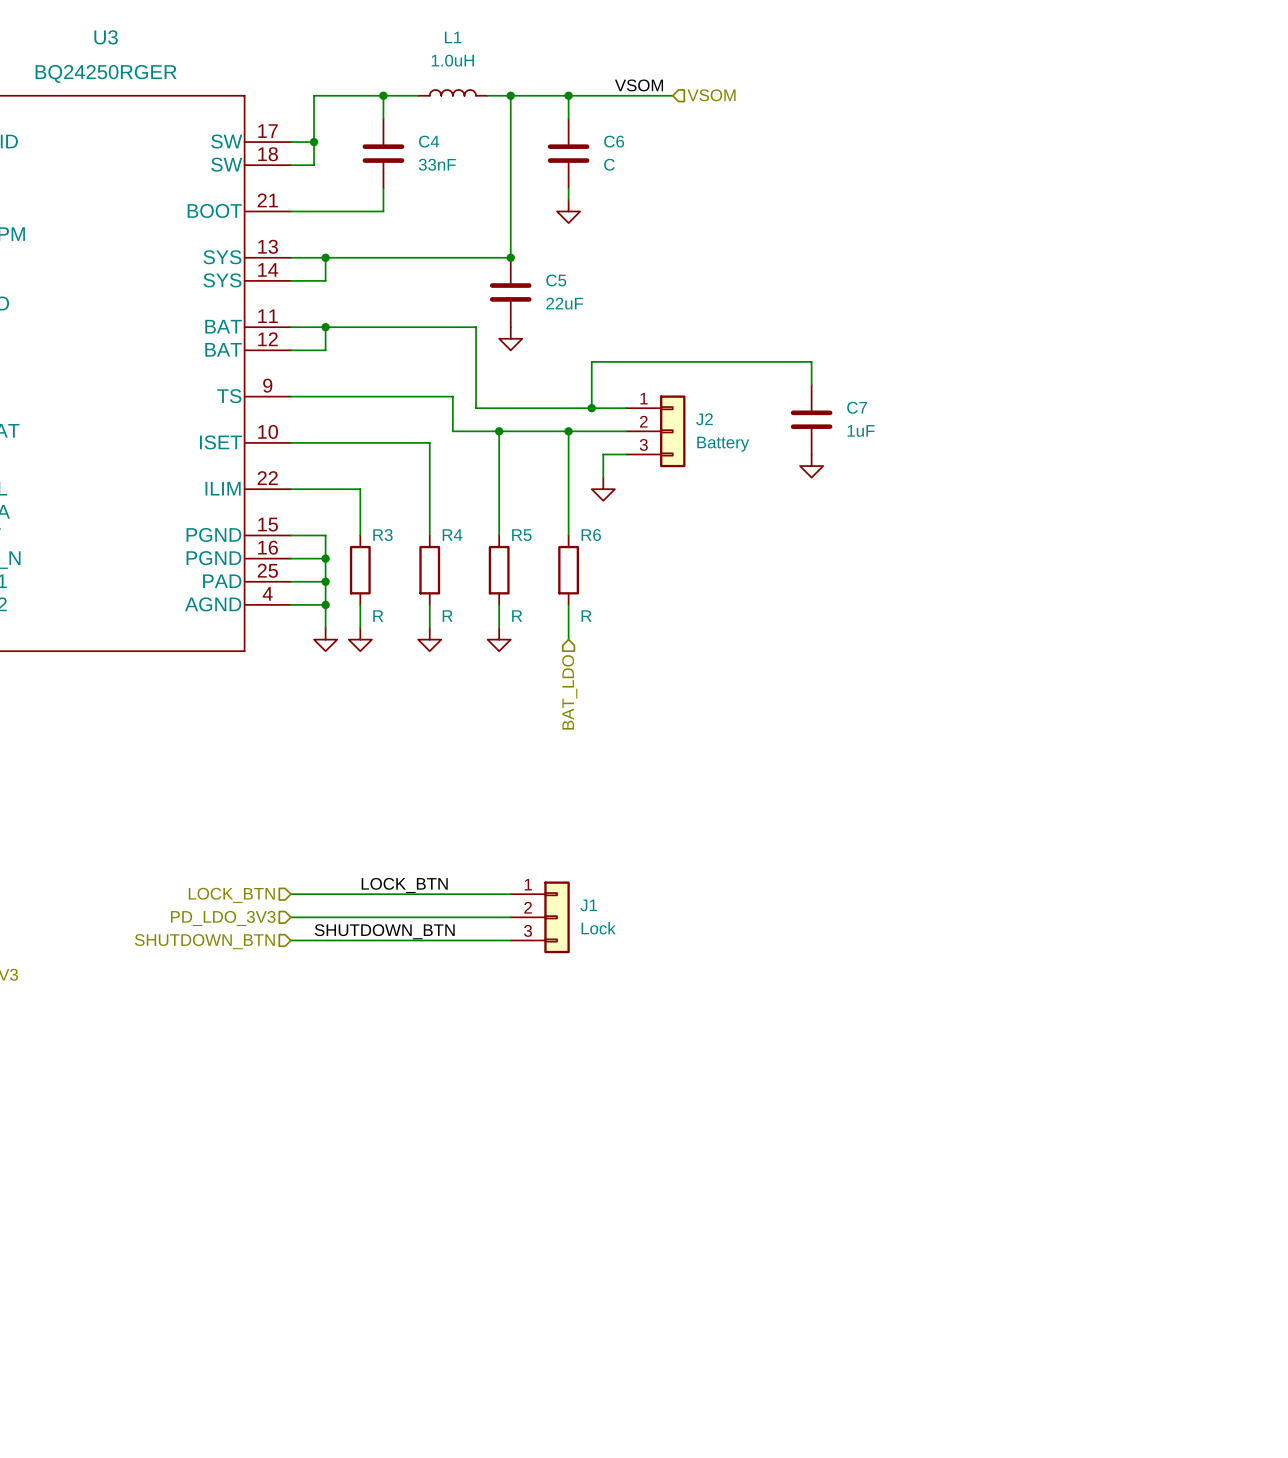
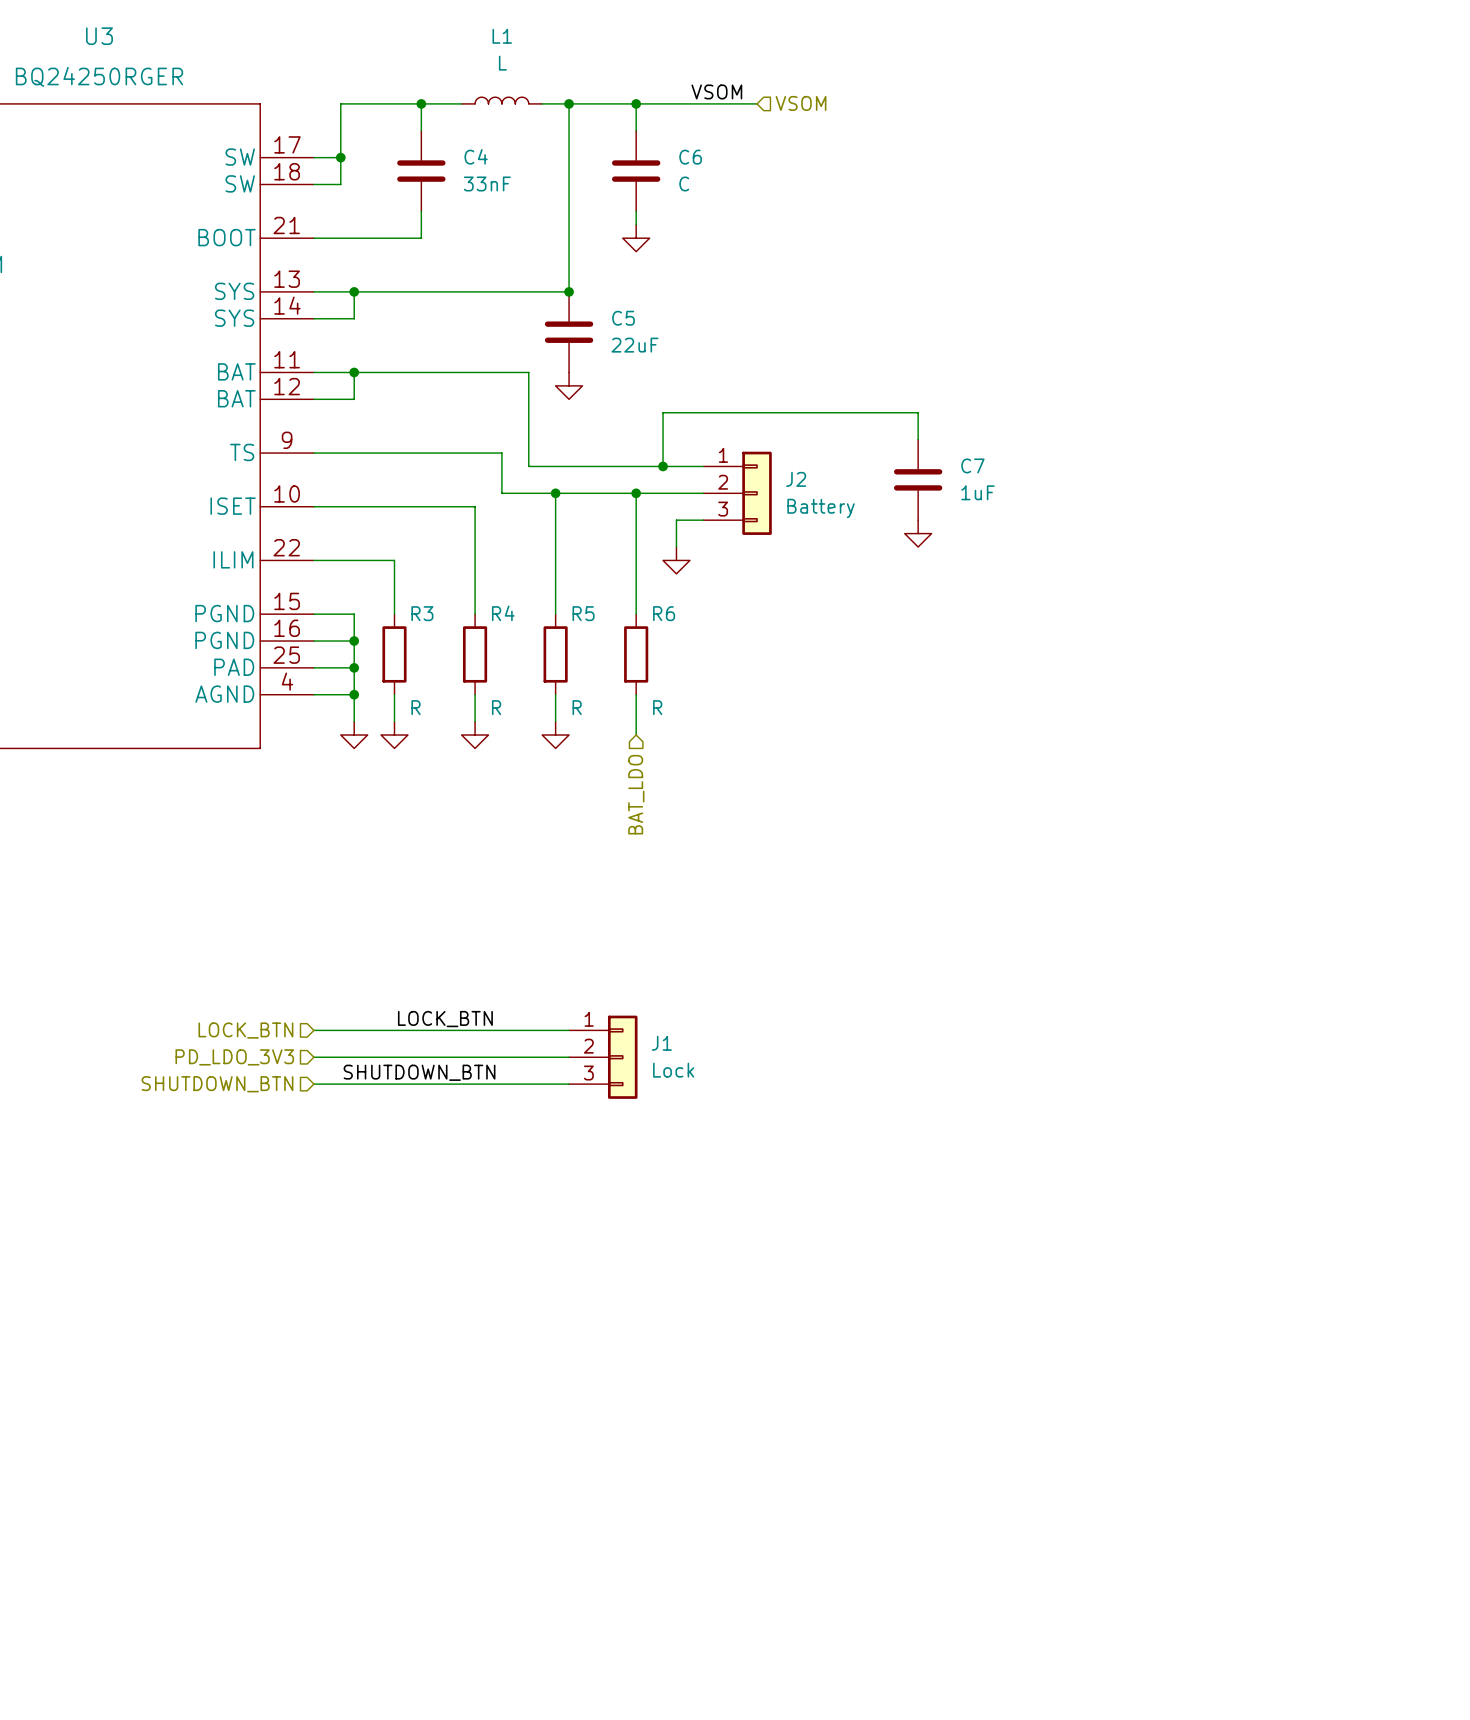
L1 value: 1.0uH (452, 60) -> L (502, 63)

